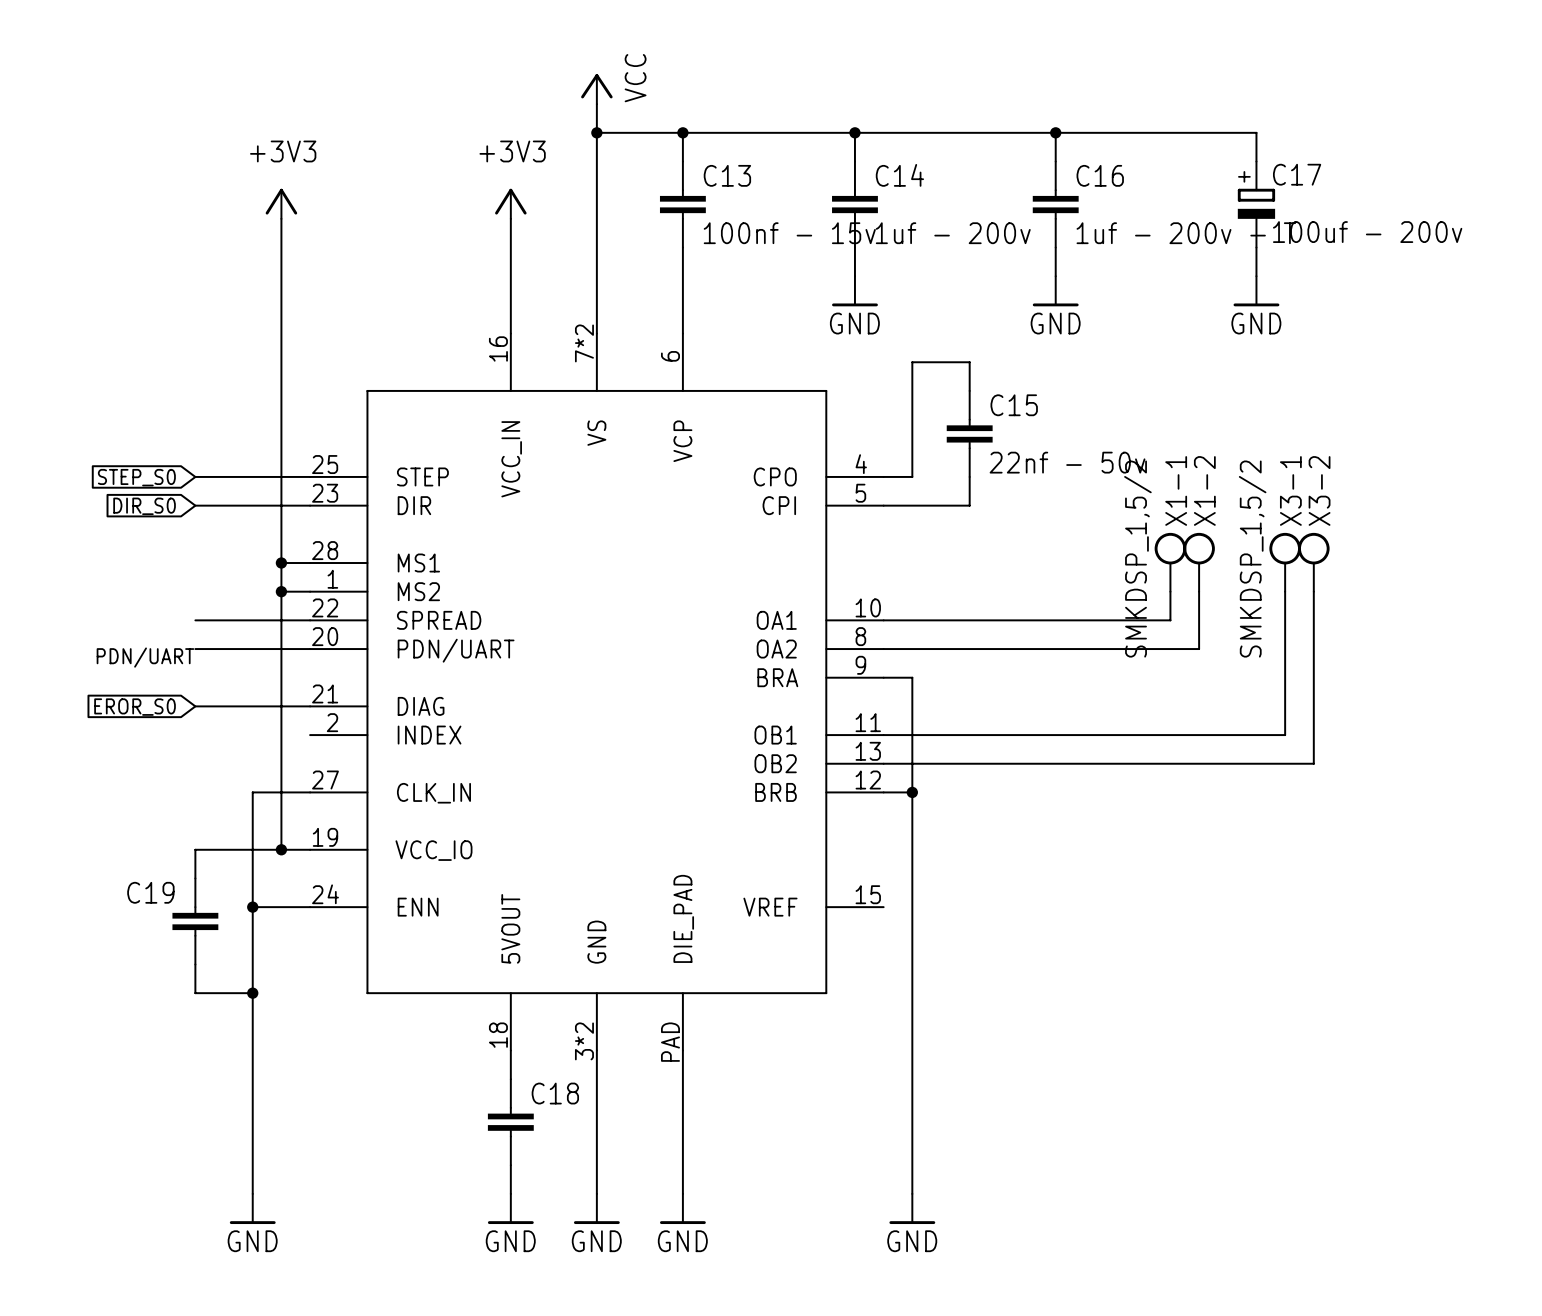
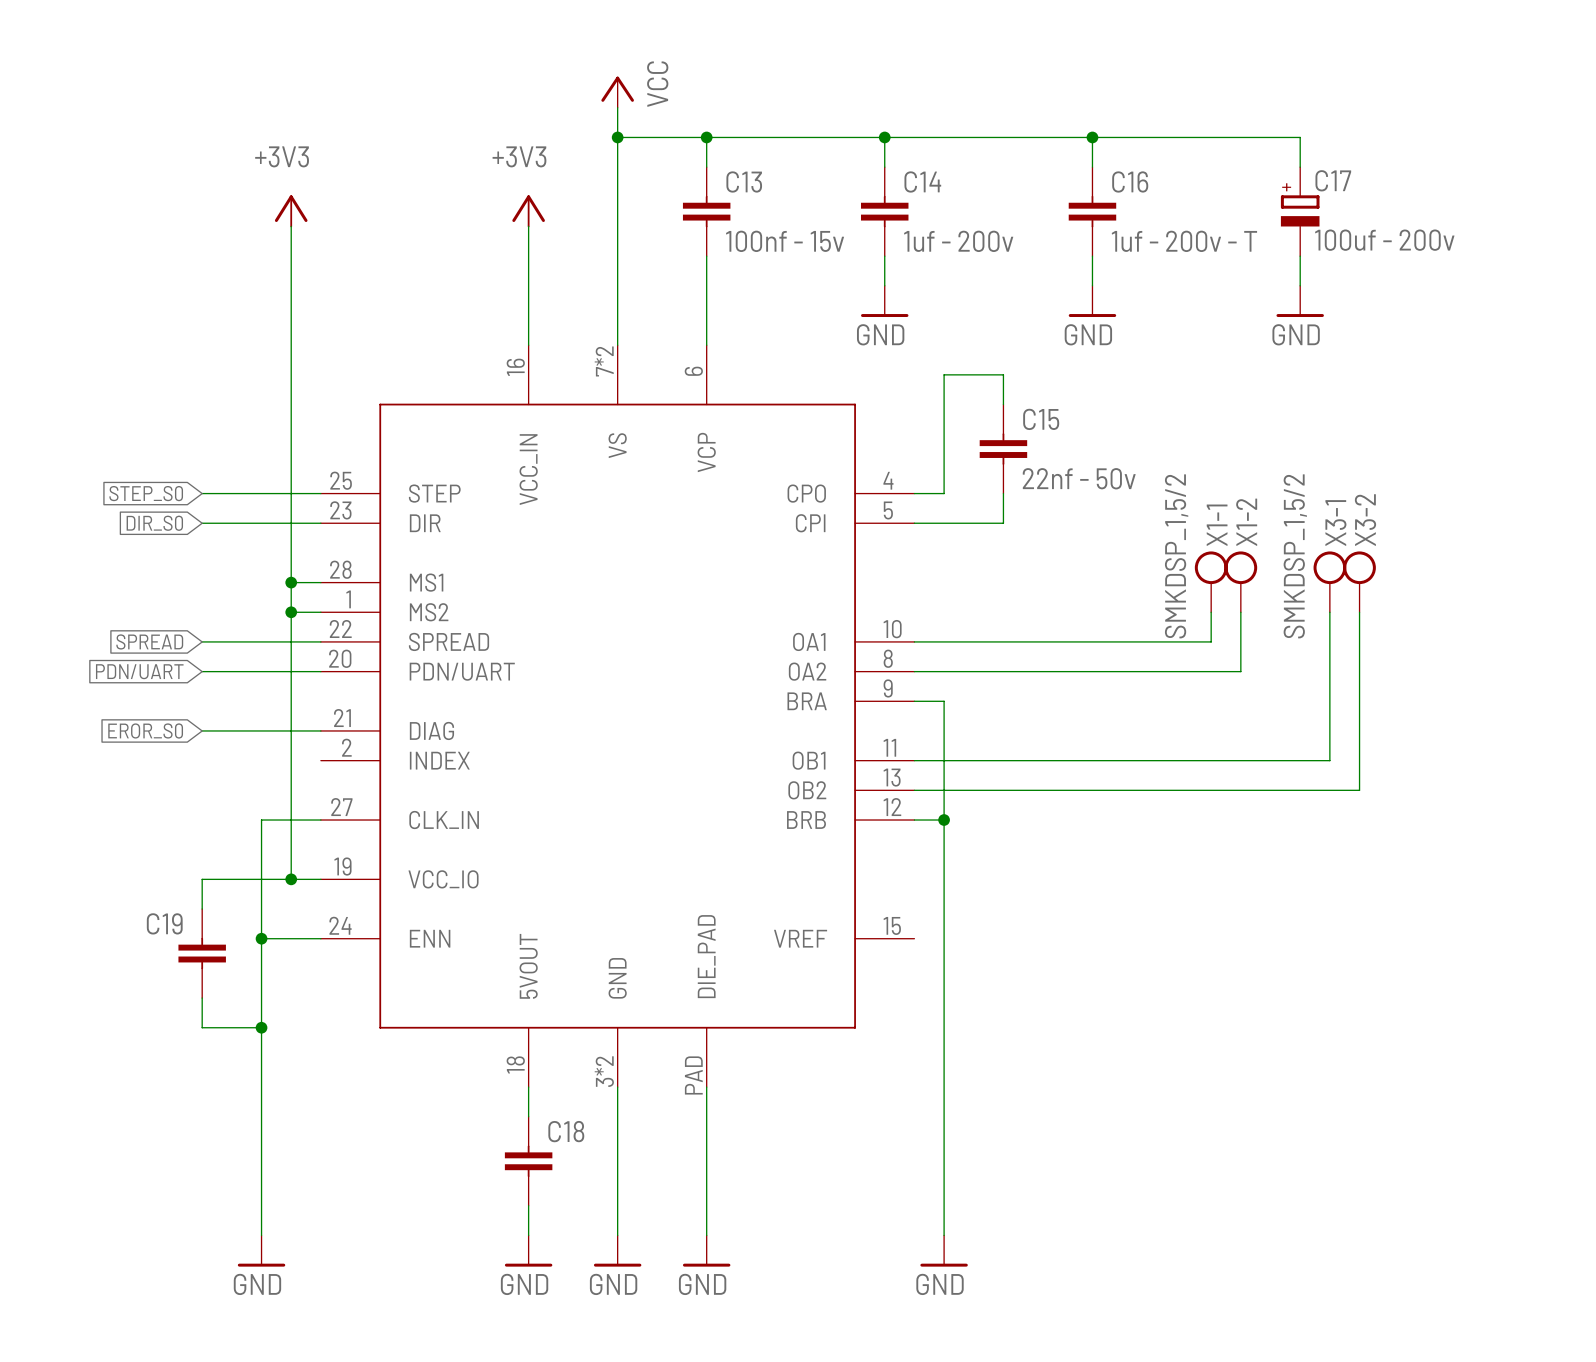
global label: none -> SPREAD (149, 641)
global label: none -> PDN/UART (139, 671)
label: PDN/UART (145, 657) -> none

